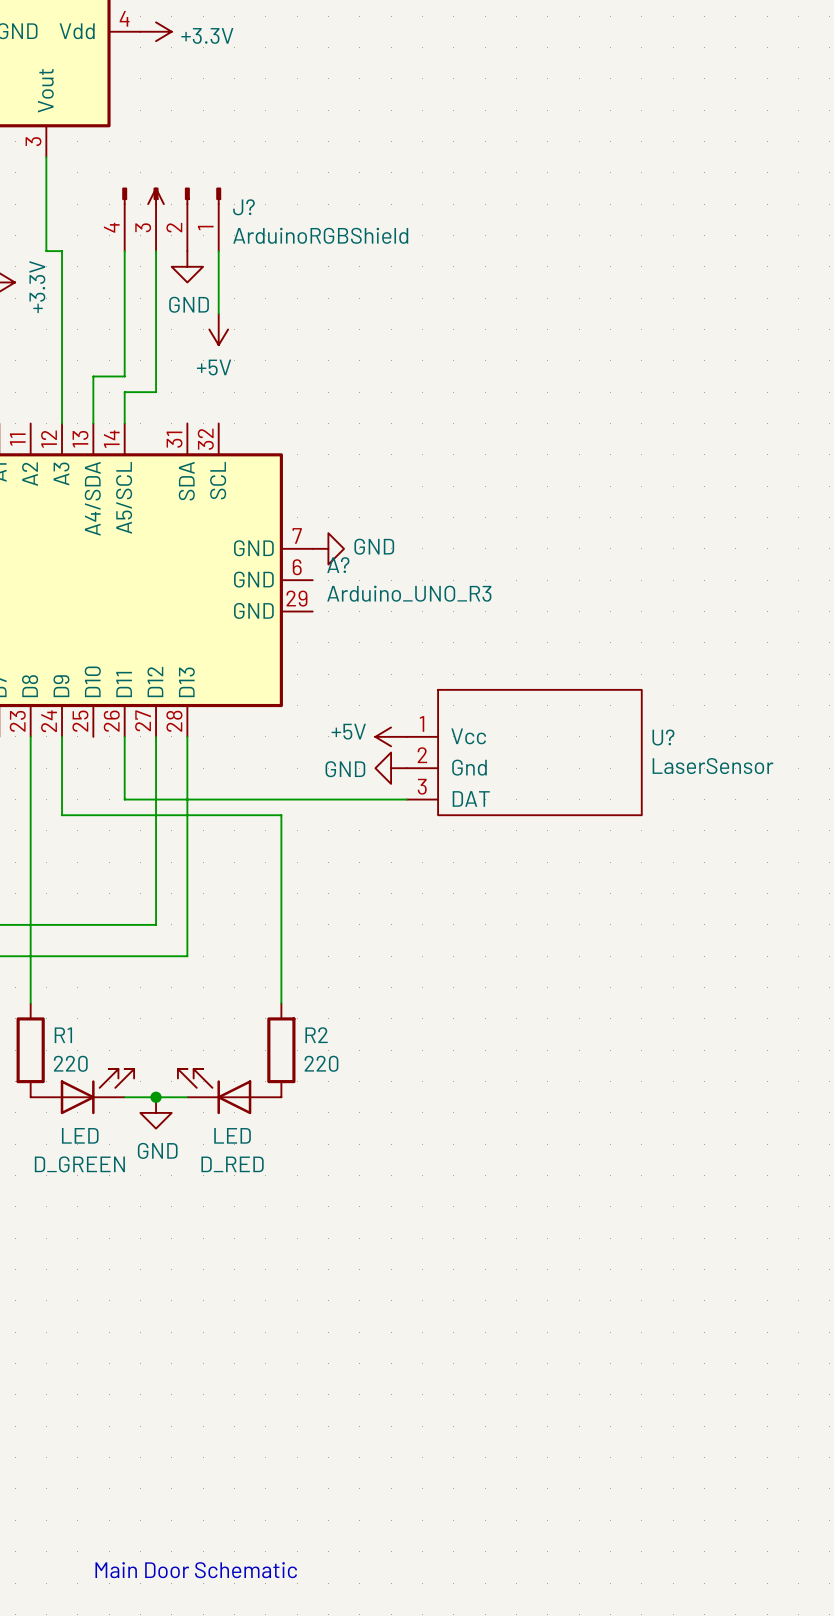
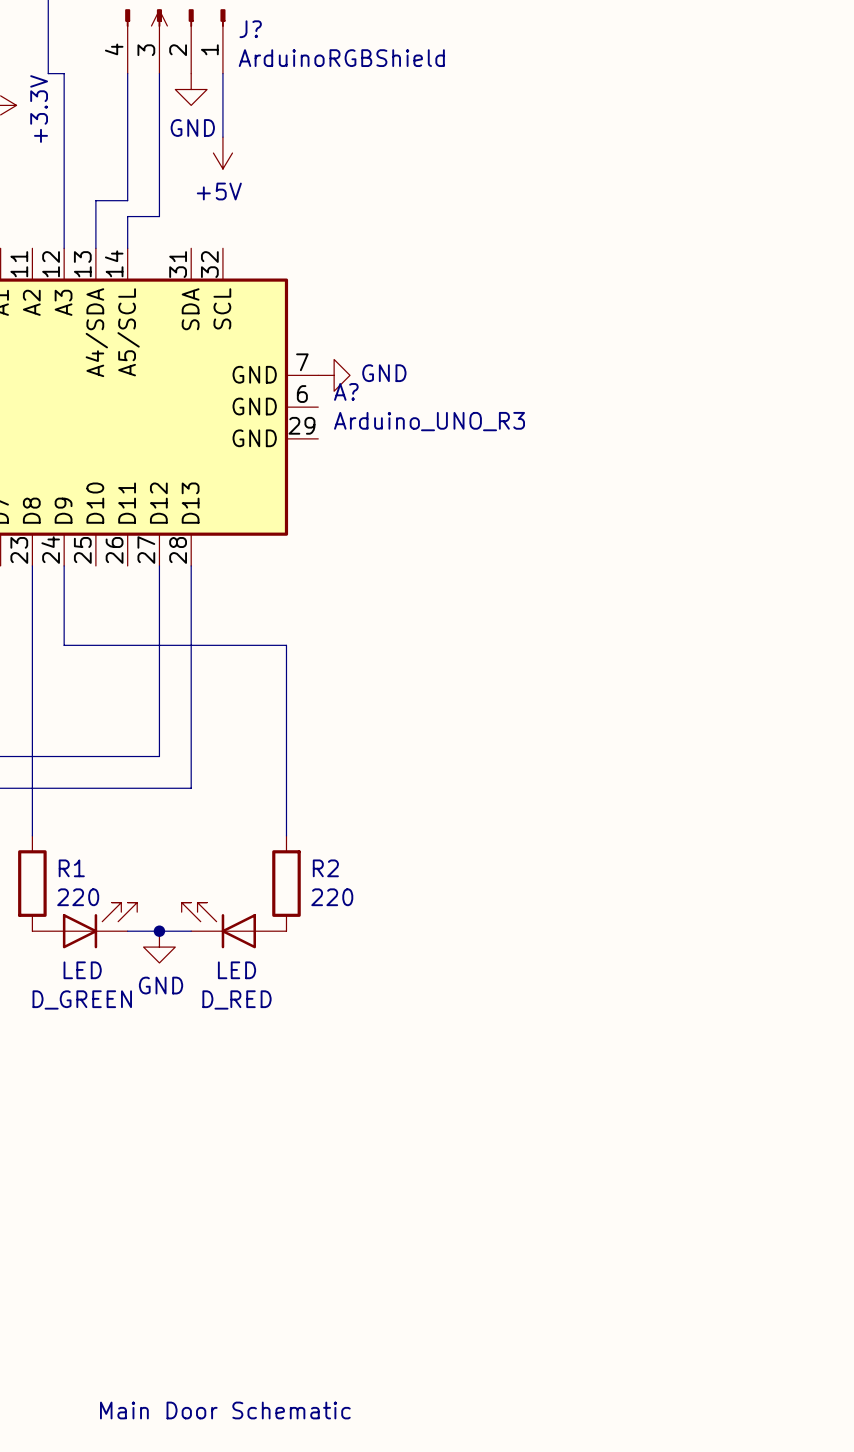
wire: (124, 736) (124, 799) (406, 799) -> none
power symbol: +5V (391, 736) -> none
U?: LaserSensor (524, 752) -> none
power symbol: GND (391, 768) -> none

